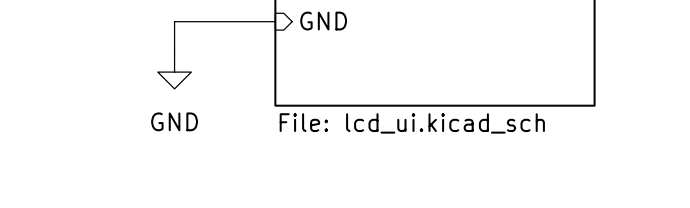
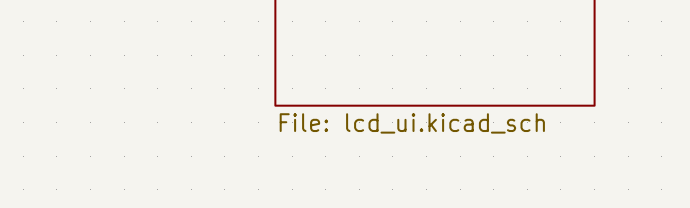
wire: (275, 21) (174, 21) (174, 55) -> none
sheet pin: GND (323, 21) -> none
power symbol: GND (174, 72) -> none

